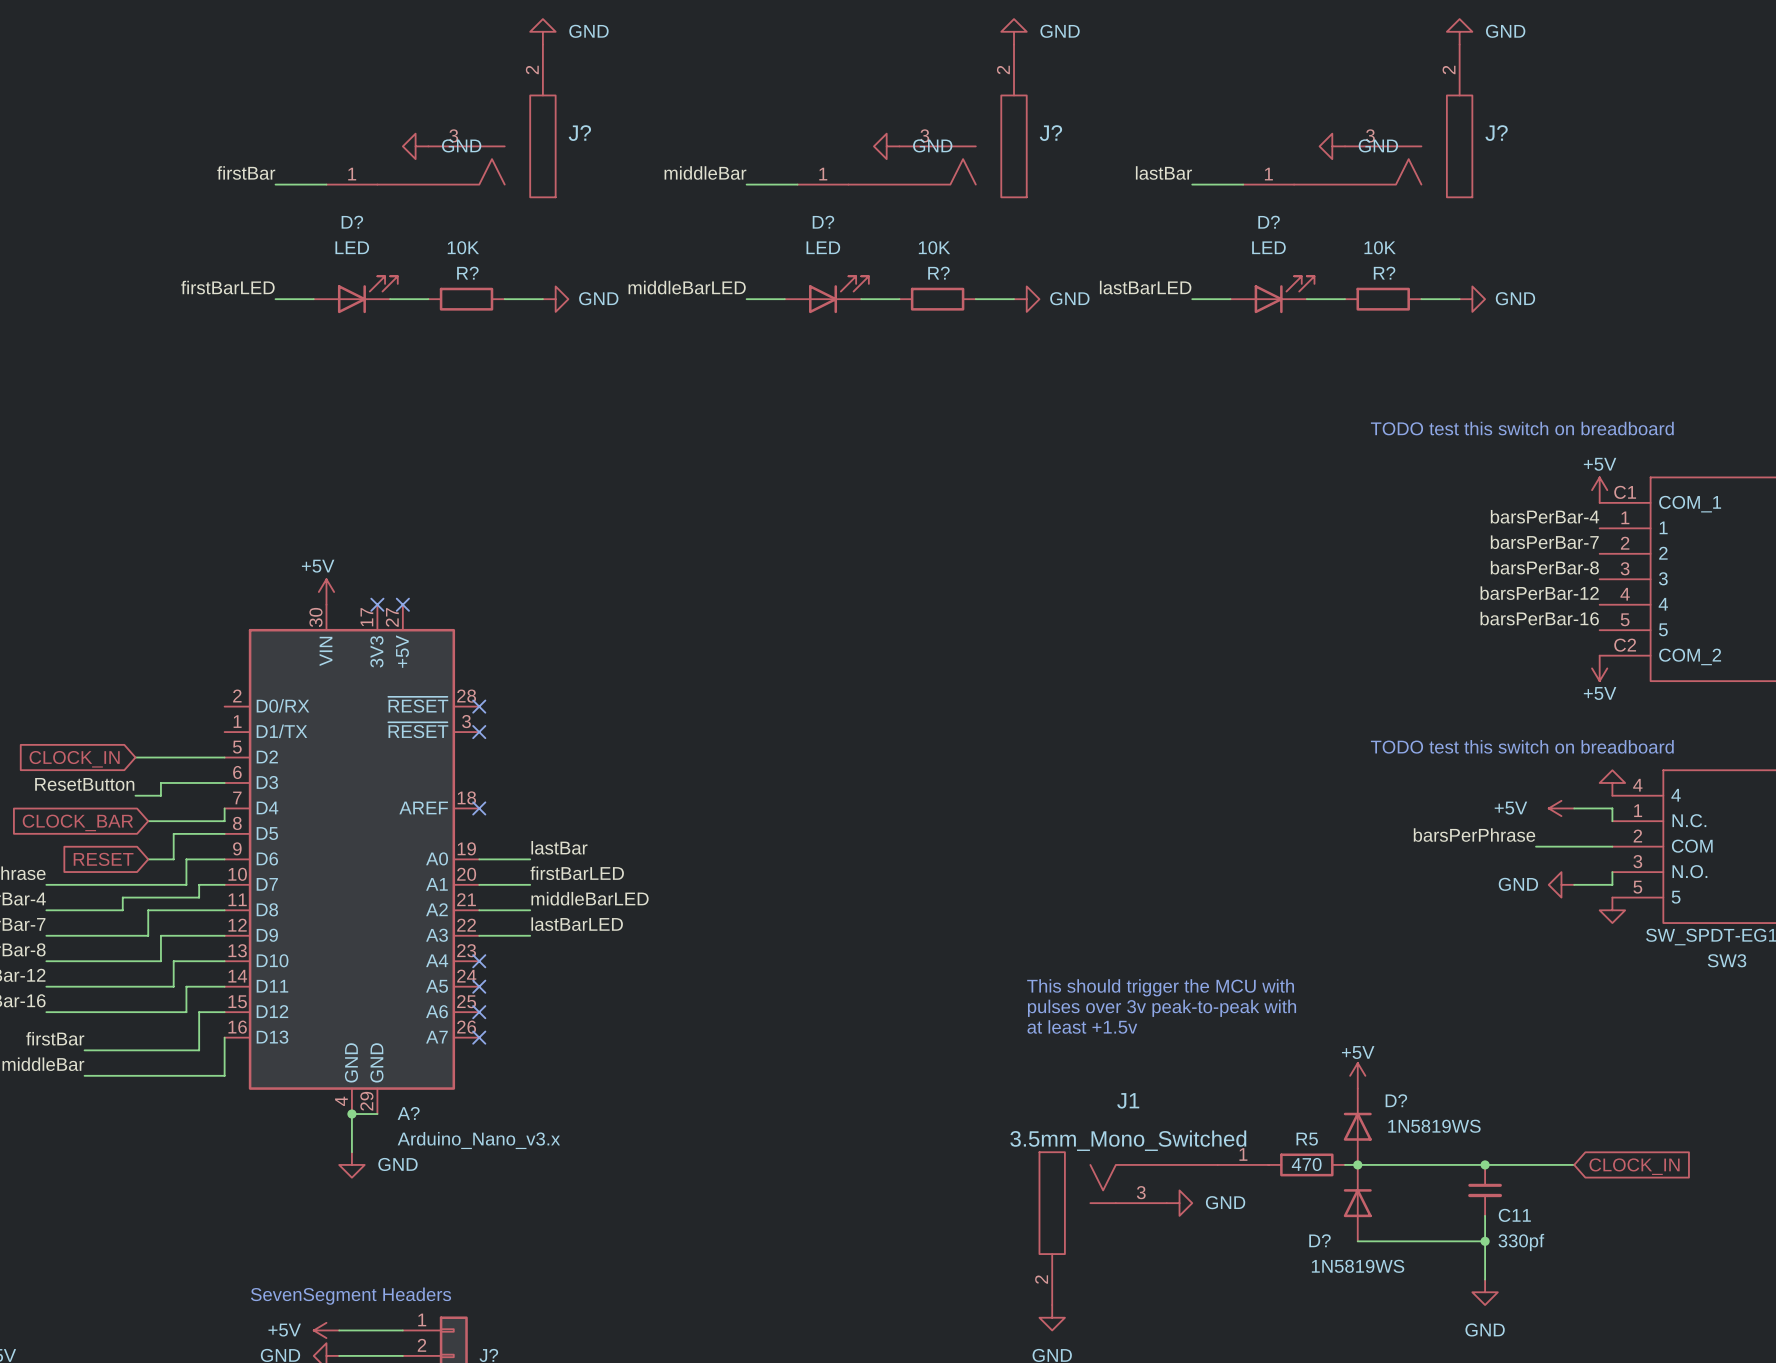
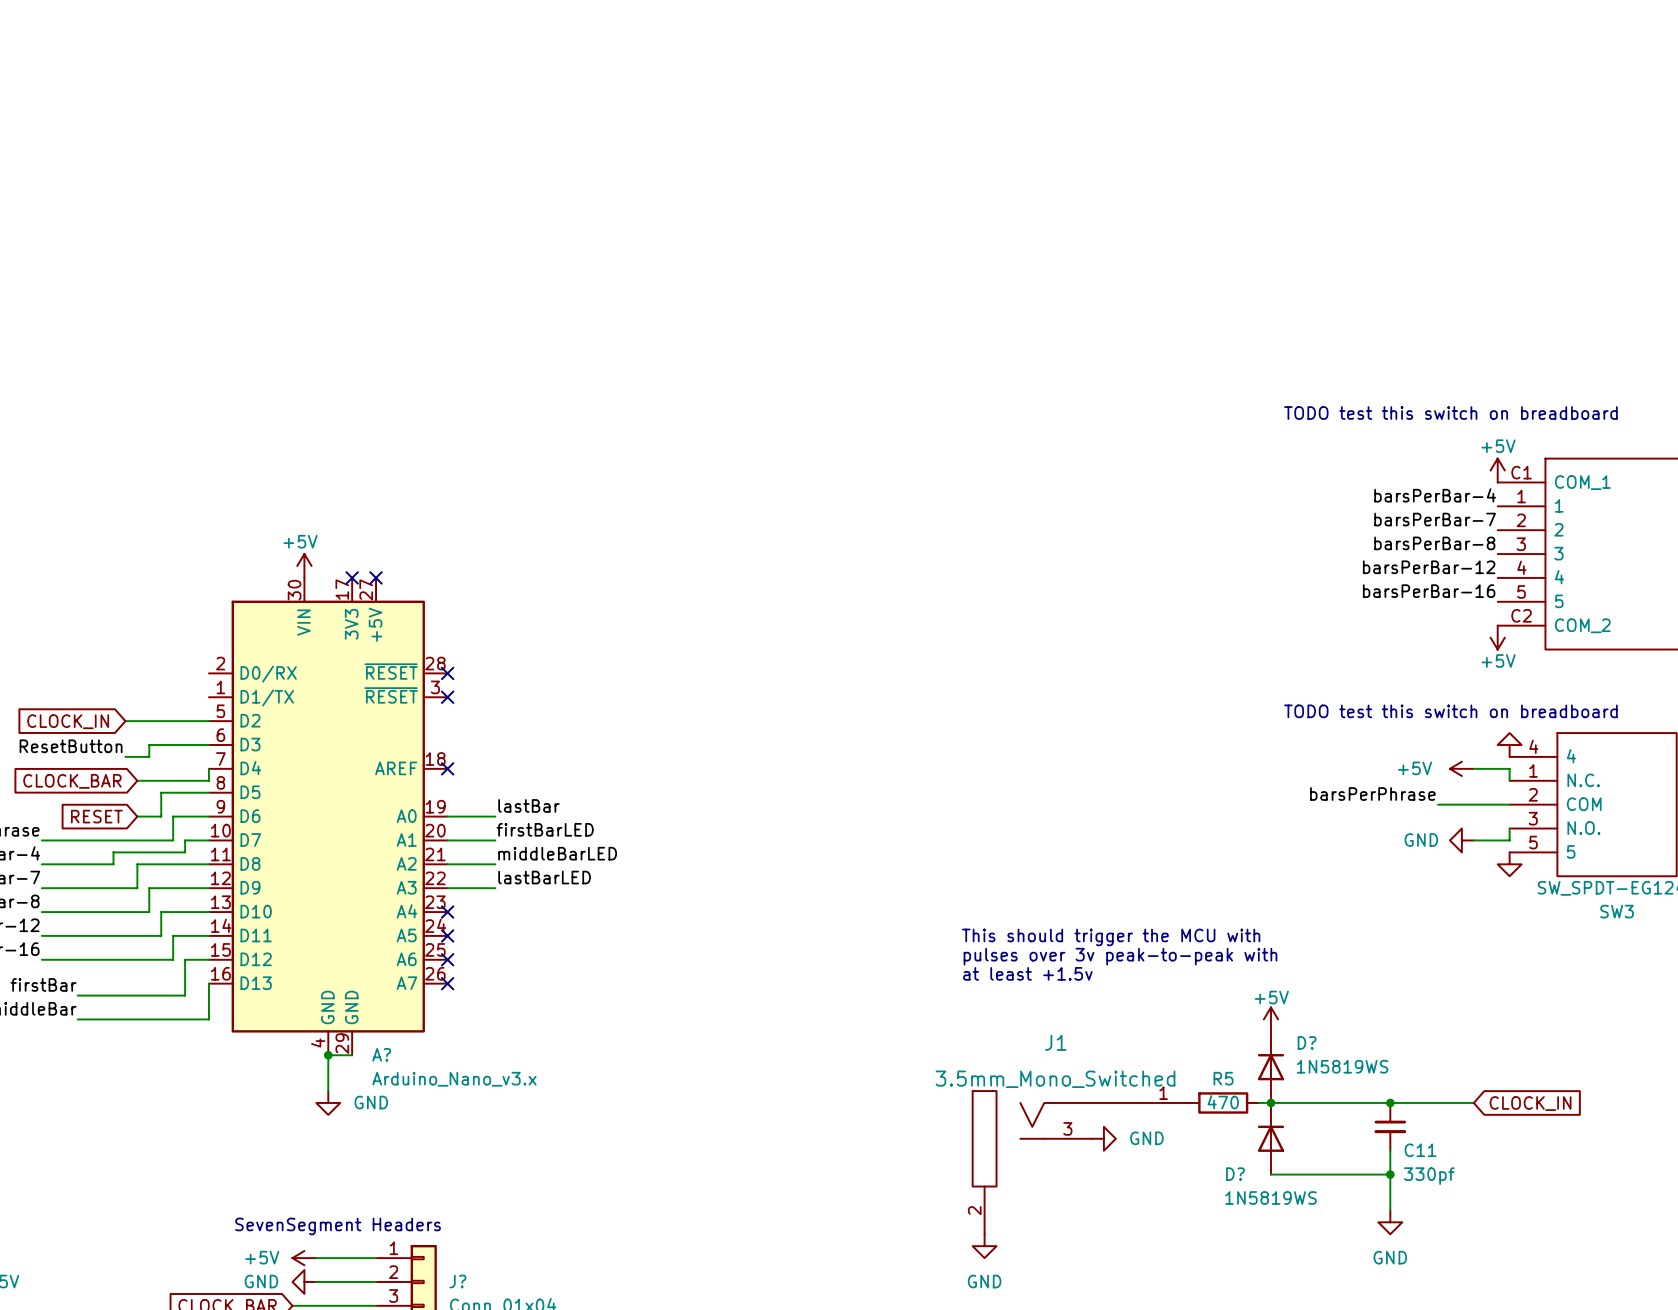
power symbol: GND (542, 31) -> none
power symbol: GND (1014, 31) -> none
power symbol: GND (1459, 31) -> none
J?: (441, 120) -> none
J?: (912, 120) -> none
J?: (1357, 120) -> none
power symbol: GND (415, 146) -> none
power symbol: GND (886, 146) -> none
power symbol: GND (1332, 146) -> none
label: firstBar (246, 172) -> none
label: middleBar (705, 172) -> none
label: lastBar (1163, 172) -> none
wire: (275, 184) (326, 184) -> none
wire: (746, 184) (797, 184) -> none
wire: (1192, 184) (1243, 184) -> none
label: firstBarLED (227, 287) -> none
label: middleBarLED (687, 287) -> none
label: lastBarLED (1145, 287) -> none
D?: LED (355, 294) -> none
D?: LED (826, 294) -> none
D?: LED (1272, 294) -> none
wire: (275, 299) (313, 299) -> none
wire: (390, 299) (428, 299) -> none
R?: 10K (466, 299) -> none
wire: (504, 299) (542, 299) -> none
power symbol: GND (555, 299) -> none
wire: (746, 299) (784, 299) -> none
wire: (861, 299) (899, 299) -> none
R?: 10K (937, 299) -> none
wire: (975, 299) (1014, 299) -> none
power symbol: GND (1026, 299) -> none
wire: (1192, 299) (1230, 299) -> none
wire: (1306, 299) (1345, 299) -> none
R?: 10K (1383, 299) -> none
wire: (1421, 299) (1459, 299) -> none
power symbol: GND (1472, 299) -> none

